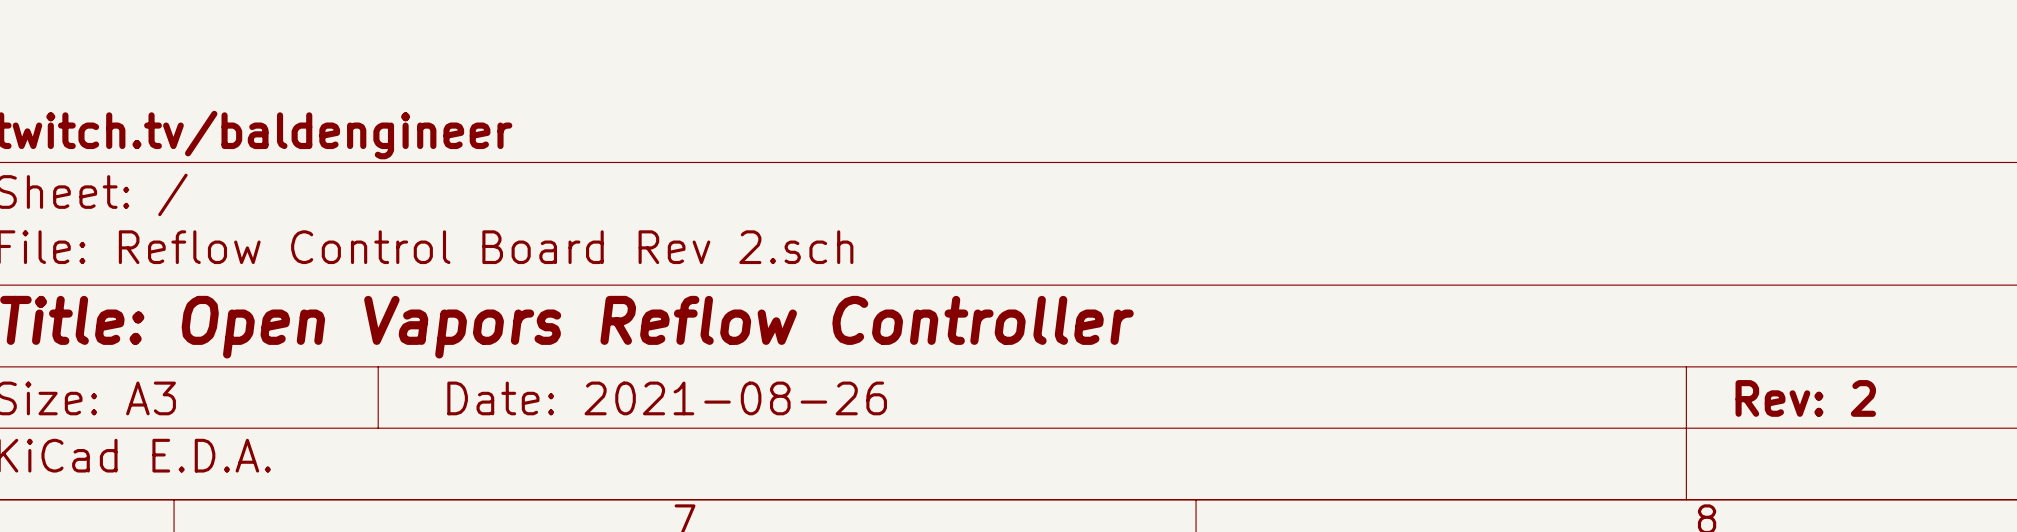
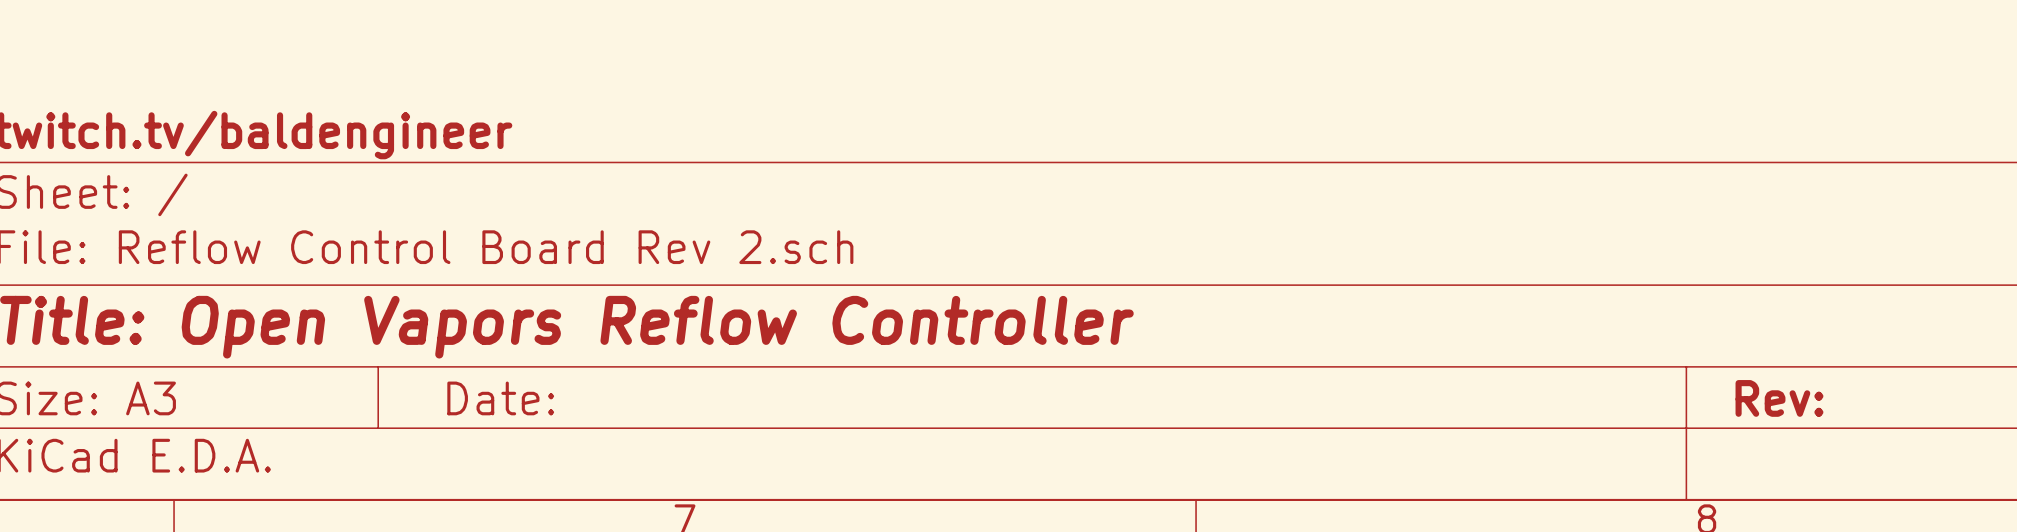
title block: Date: 2021-08-26 (667, 398) -> Date: (500, 398)
title block: Rev: 2 (1805, 398) -> Rev: (1779, 398)

